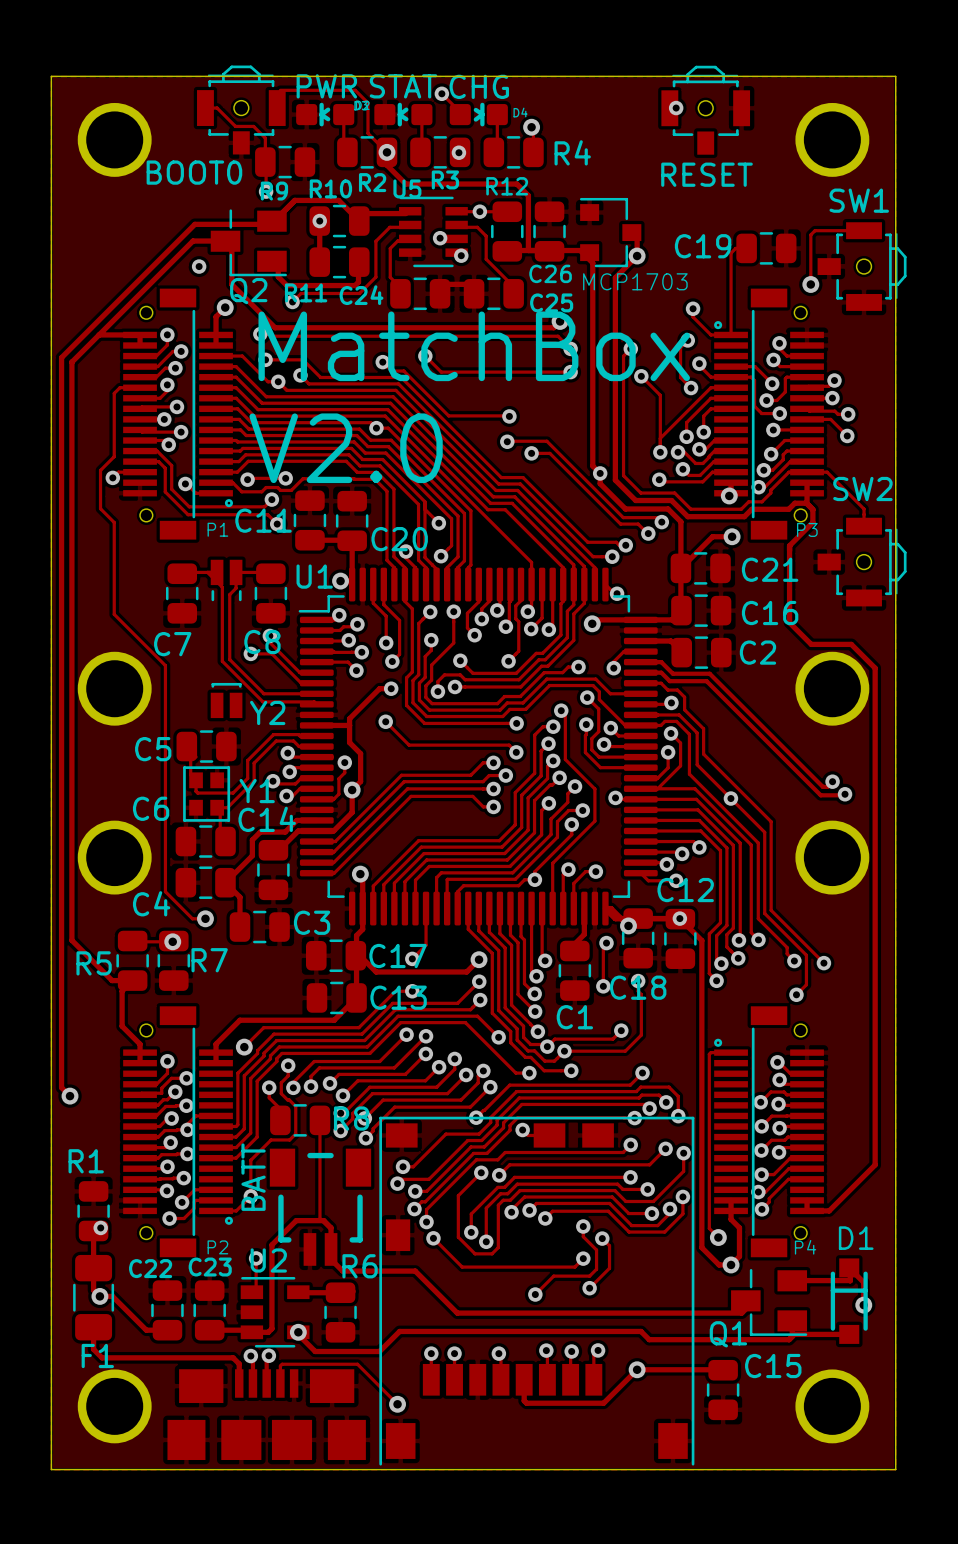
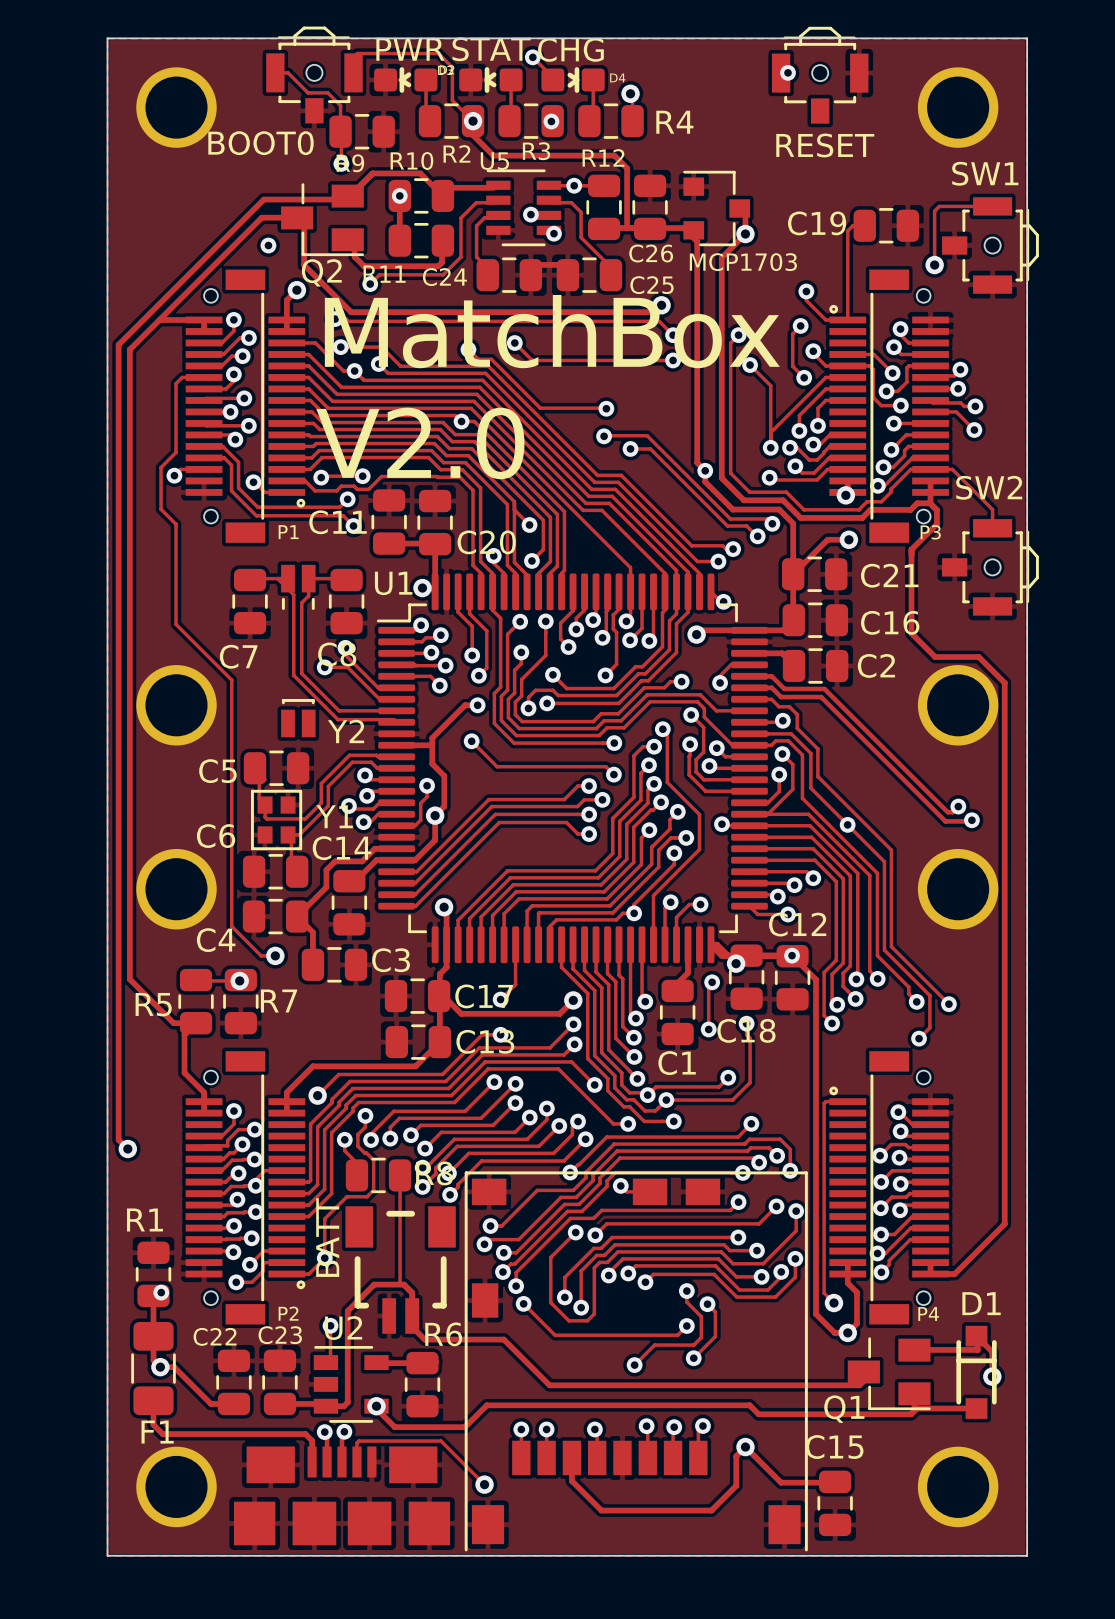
C15 name position: C15 (773, 1366) -> C15 (834, 1447)
track: (637, 1369) (723, 1370) -> (745, 1447) (781, 1482) (835, 1482)
track: (628, 1378) (603, 1403) (526, 1403) (524, 1400) (524, 1379) -> (736, 1456) (736, 1485) (711, 1510) (601, 1510) (571, 1480) (571, 1457)
C15 position: (723, 1390) -> (835, 1503)

